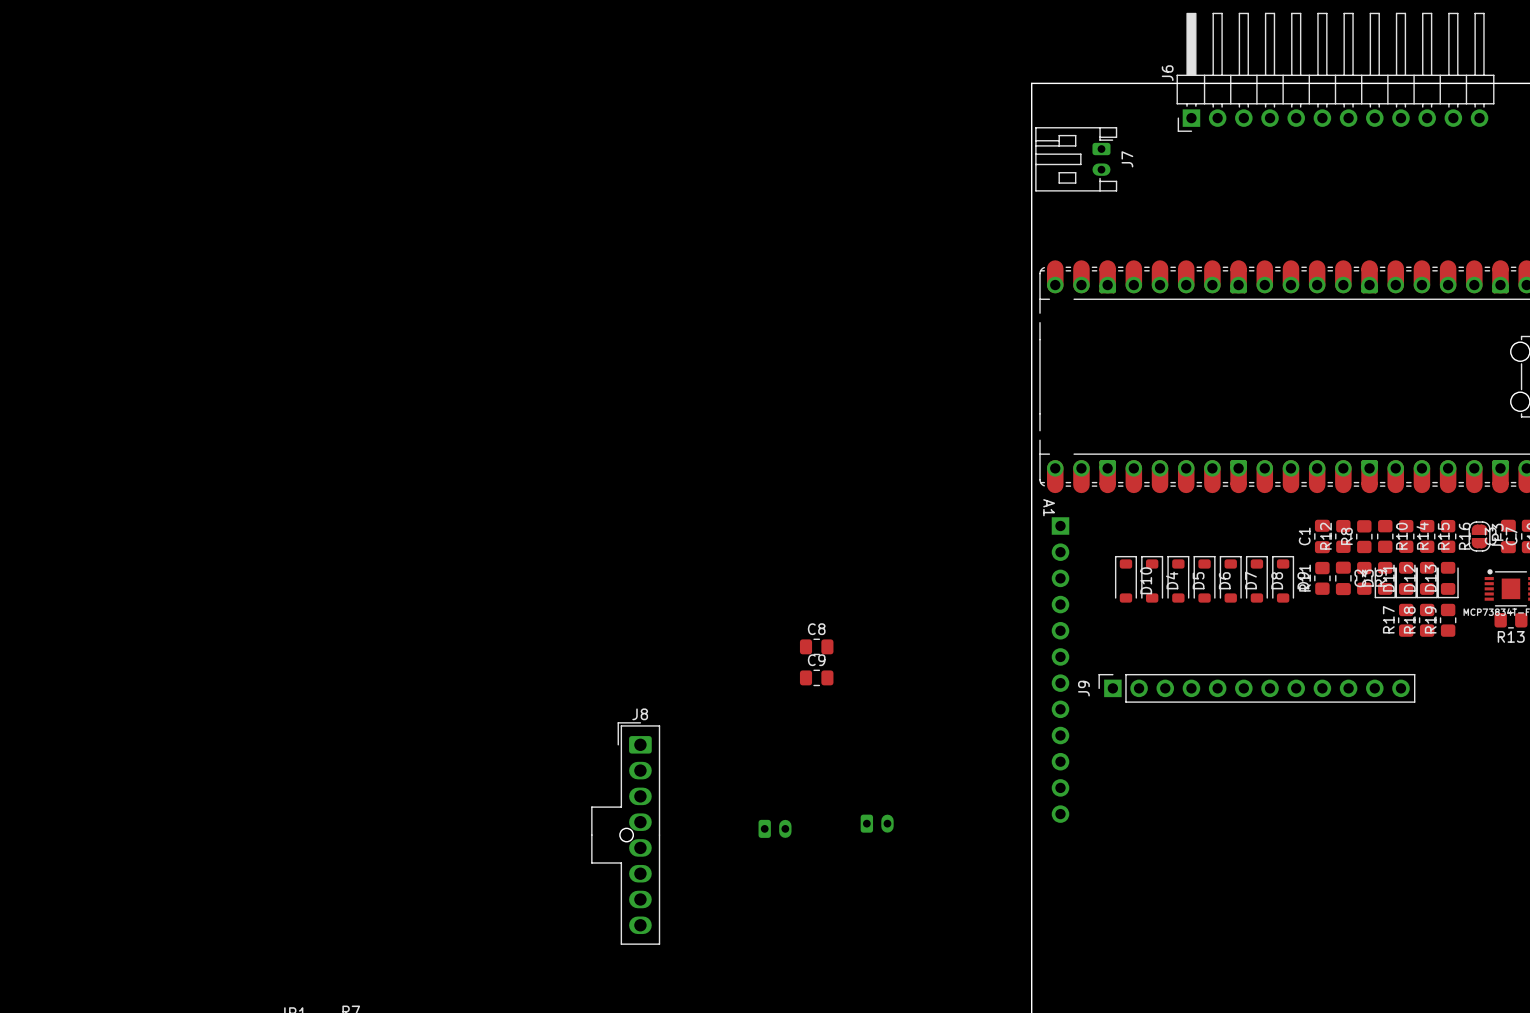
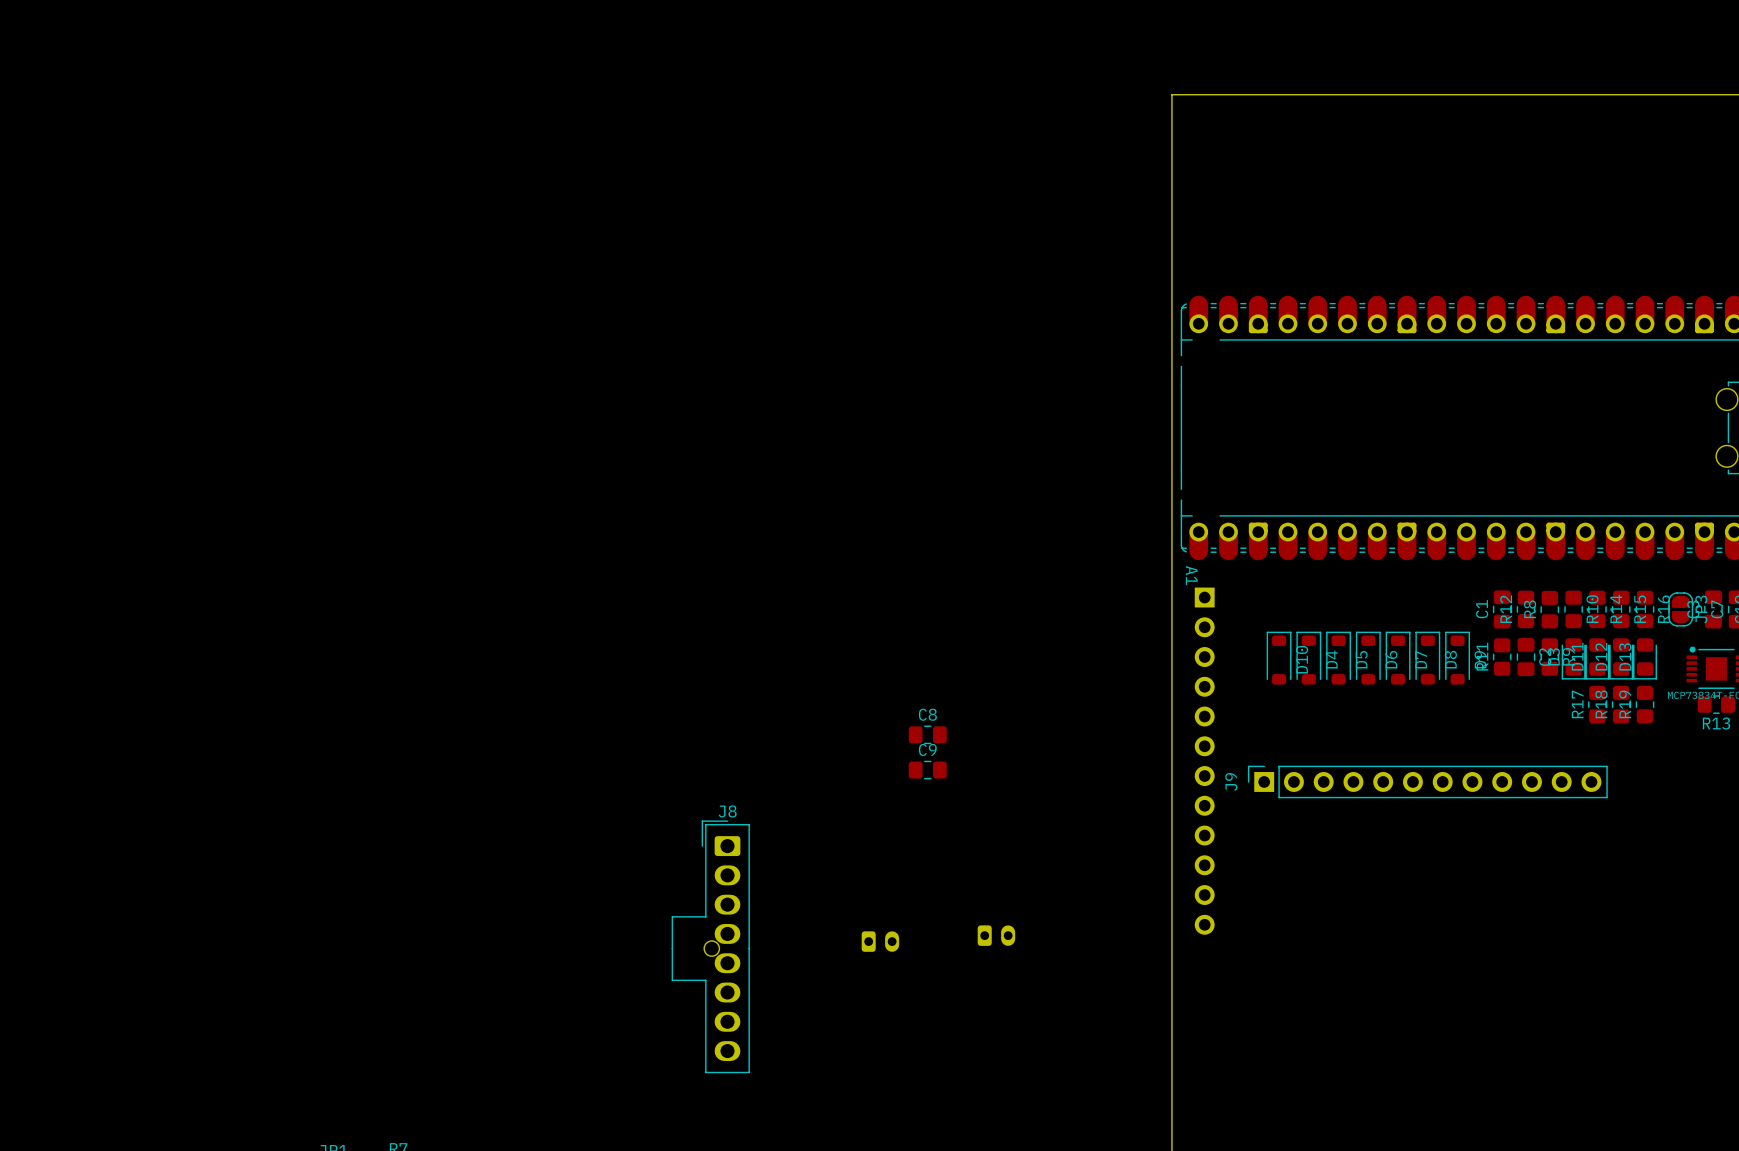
J6: (1335, 72) -> none
J7: (1076, 159) -> none

